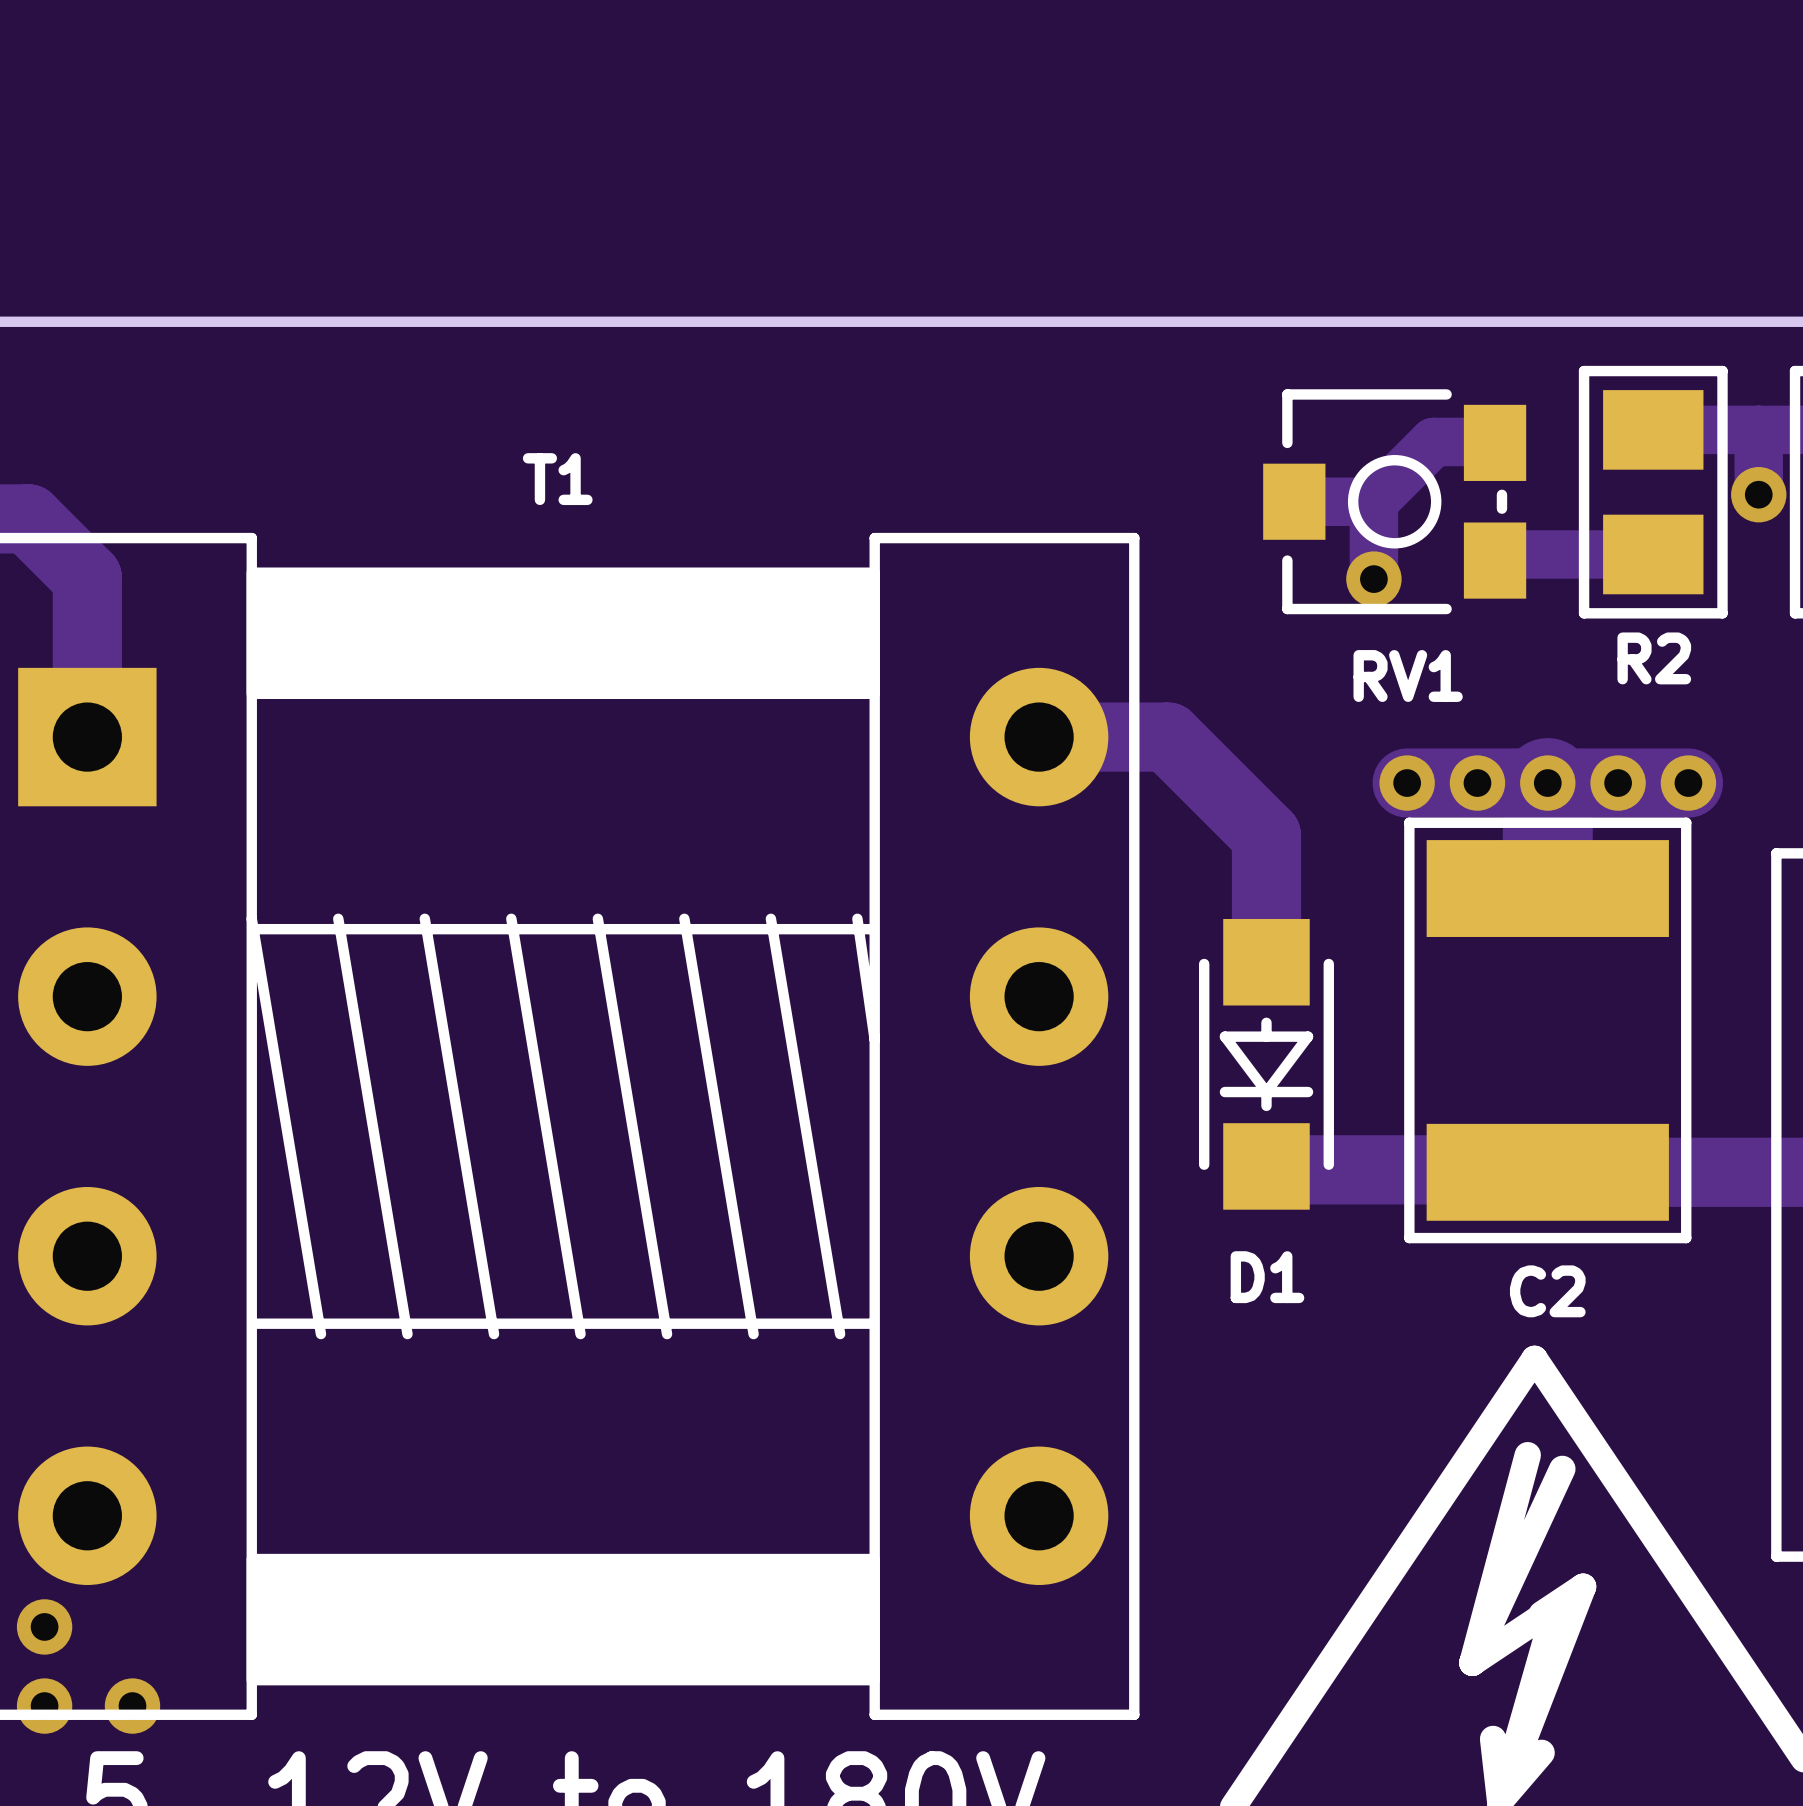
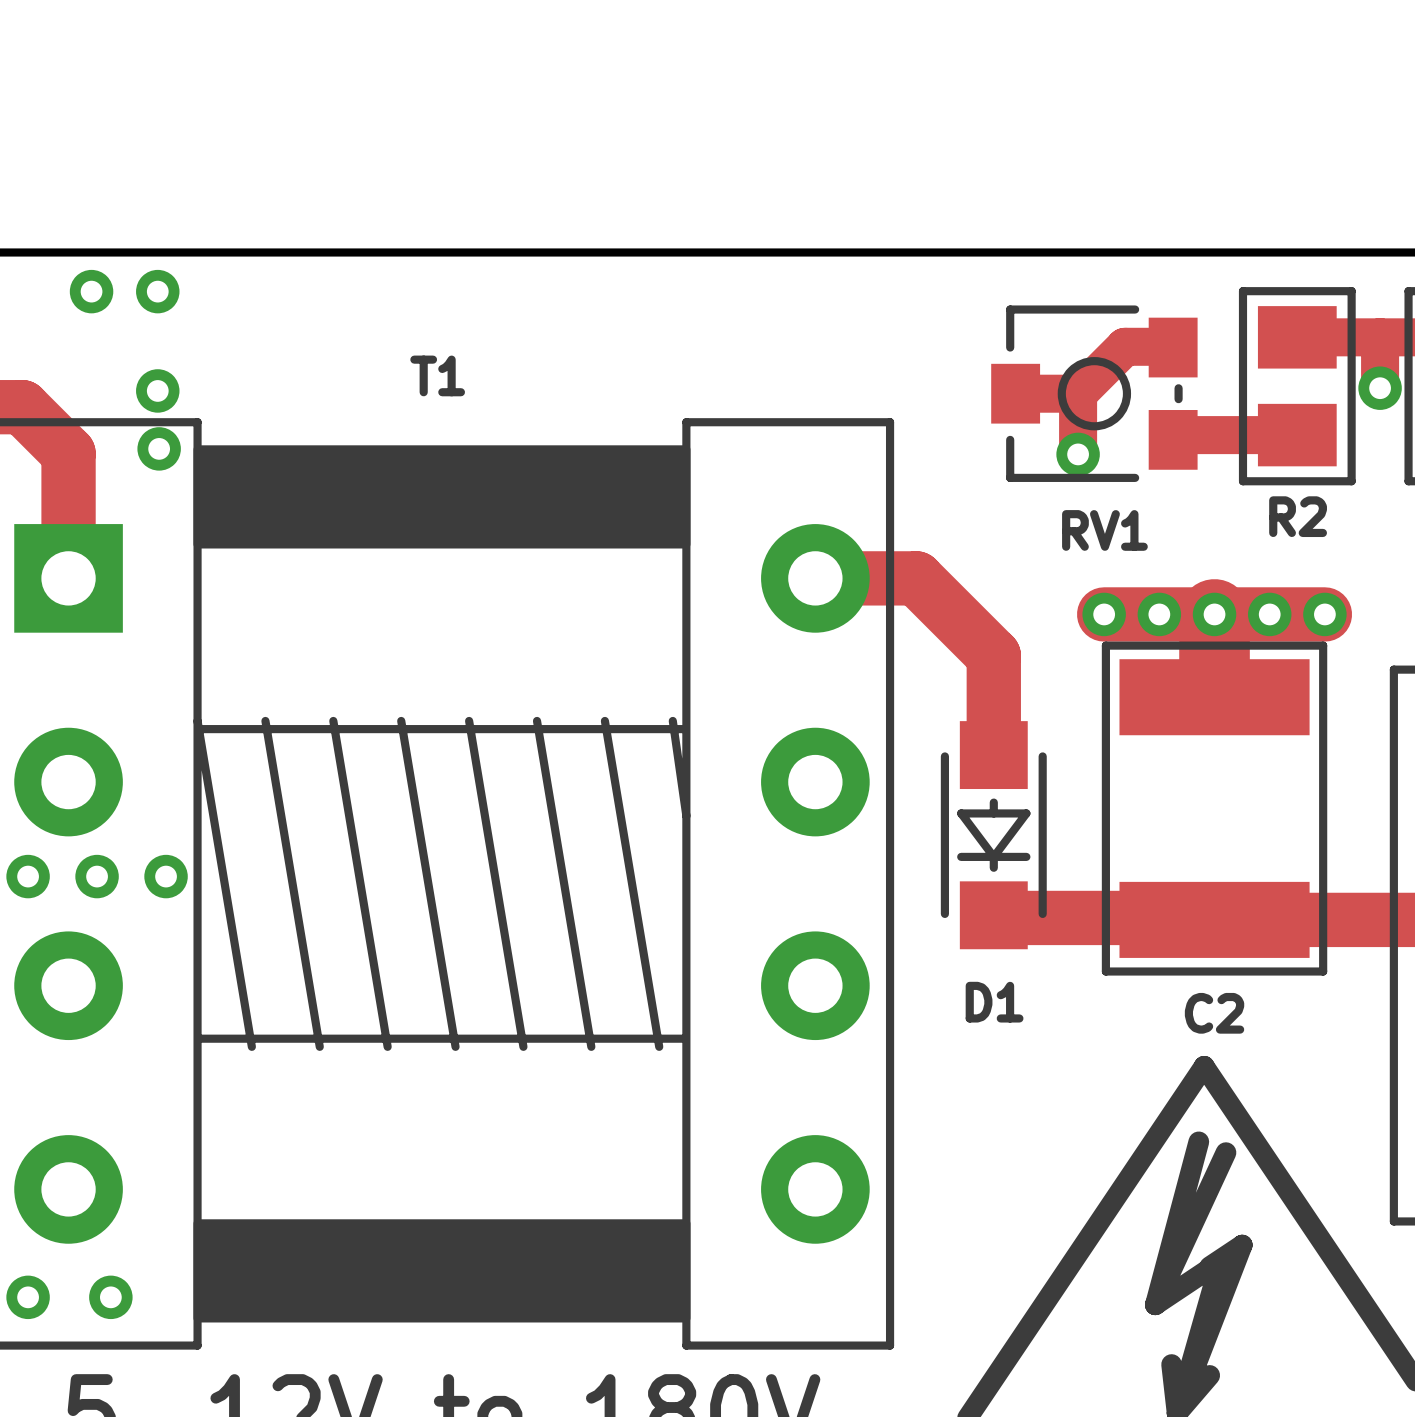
via: none -> (91, 291)
via: none -> (157, 291)
via: none -> (157, 390)
via: none -> (159, 448)
via: none -> (28, 876)
via: none -> (97, 876)
via: none -> (166, 876)
via: (44, 1626) -> none
via: none -> (28, 1297)
via: (44, 1706) -> none
via position: (132, 1706) -> (110, 1297)

